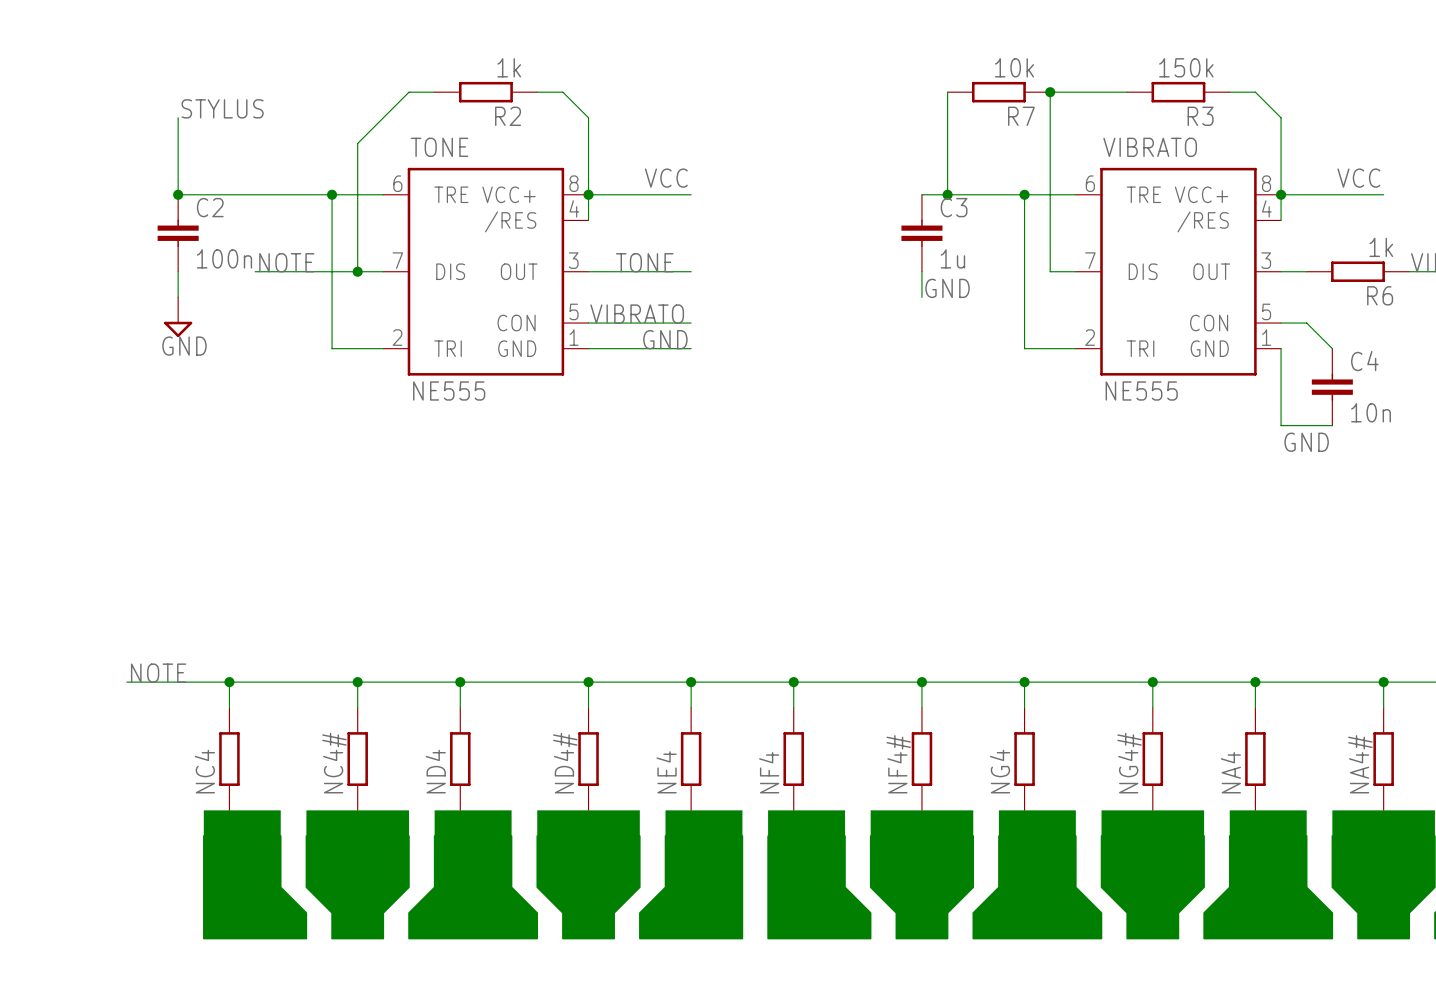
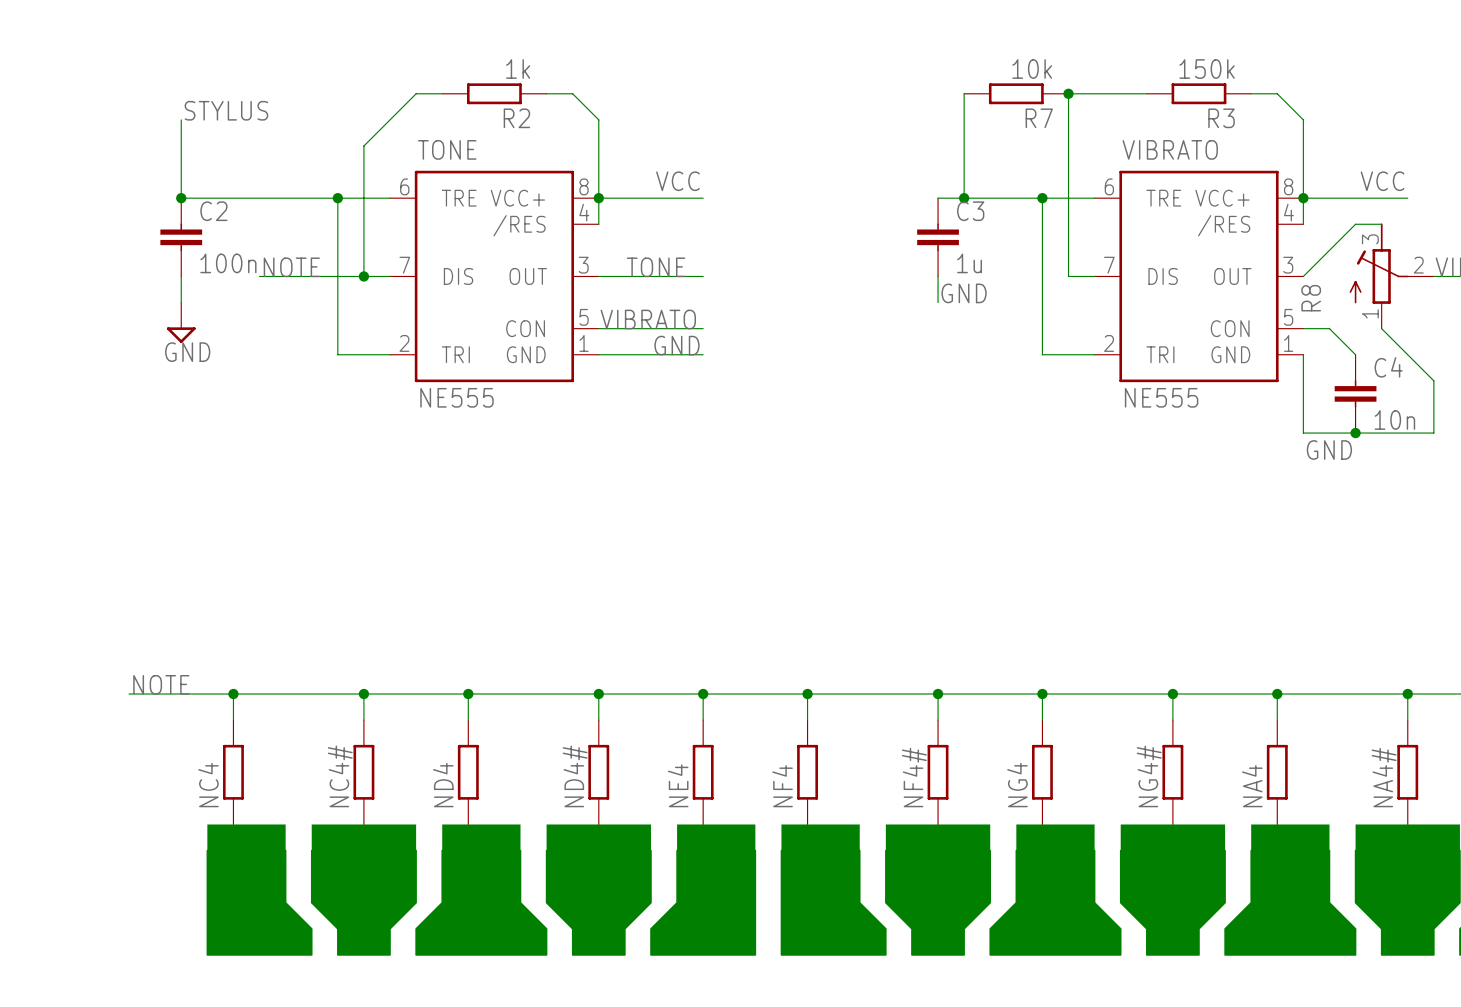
wire: (1281, 271) (1306, 271) -> (1303, 276) (1355, 224) (1381, 224)
R6: 1k (1357, 271) -> none
R8: none -> (1391, 276)
wire: none -> (1381, 328) (1433, 380) (1433, 433) (1355, 433)
junction: none -> (1355, 433)

